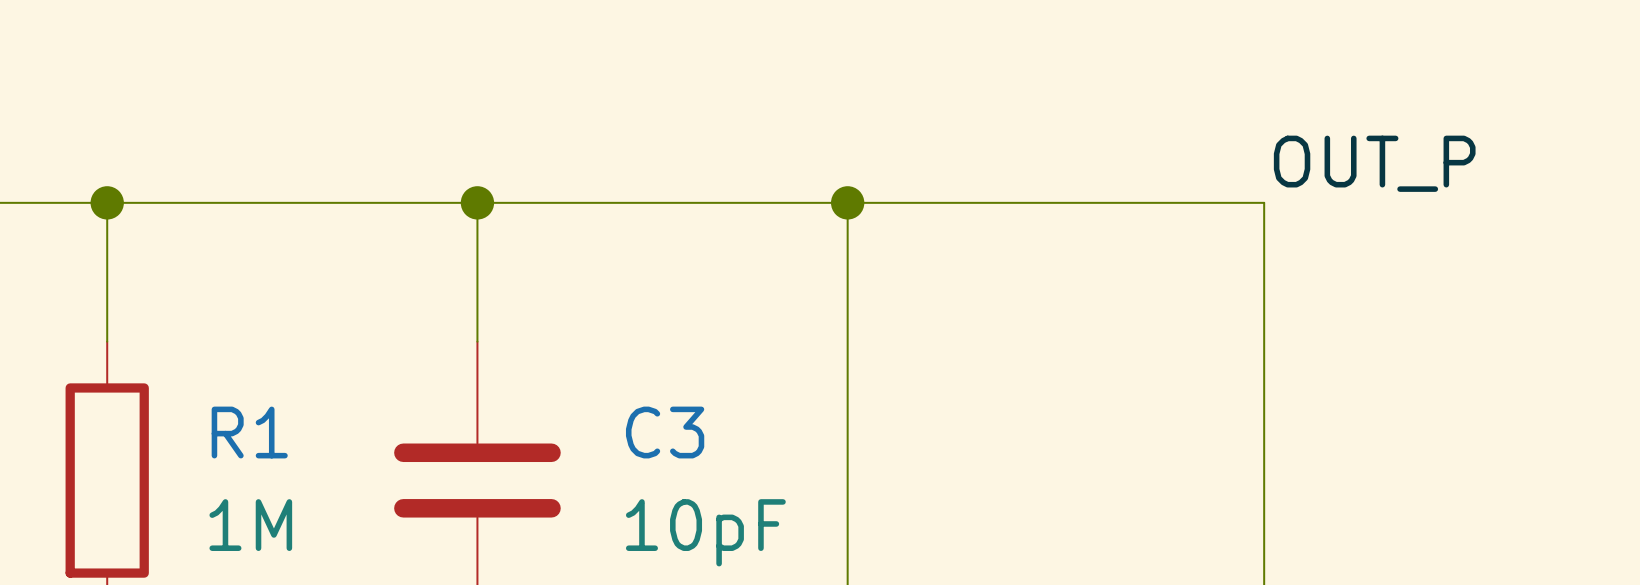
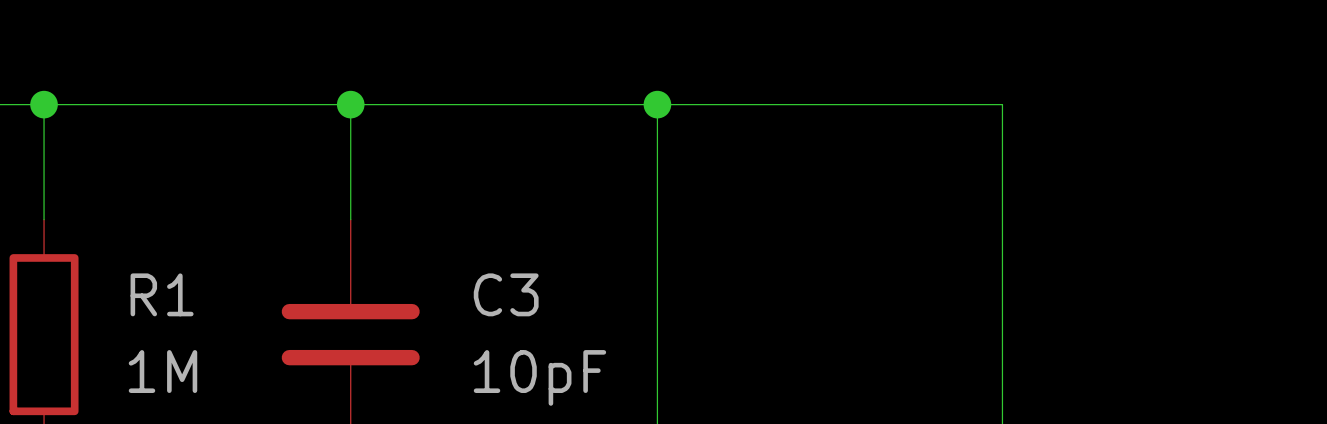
label: OUT_P (1374, 163) -> none

